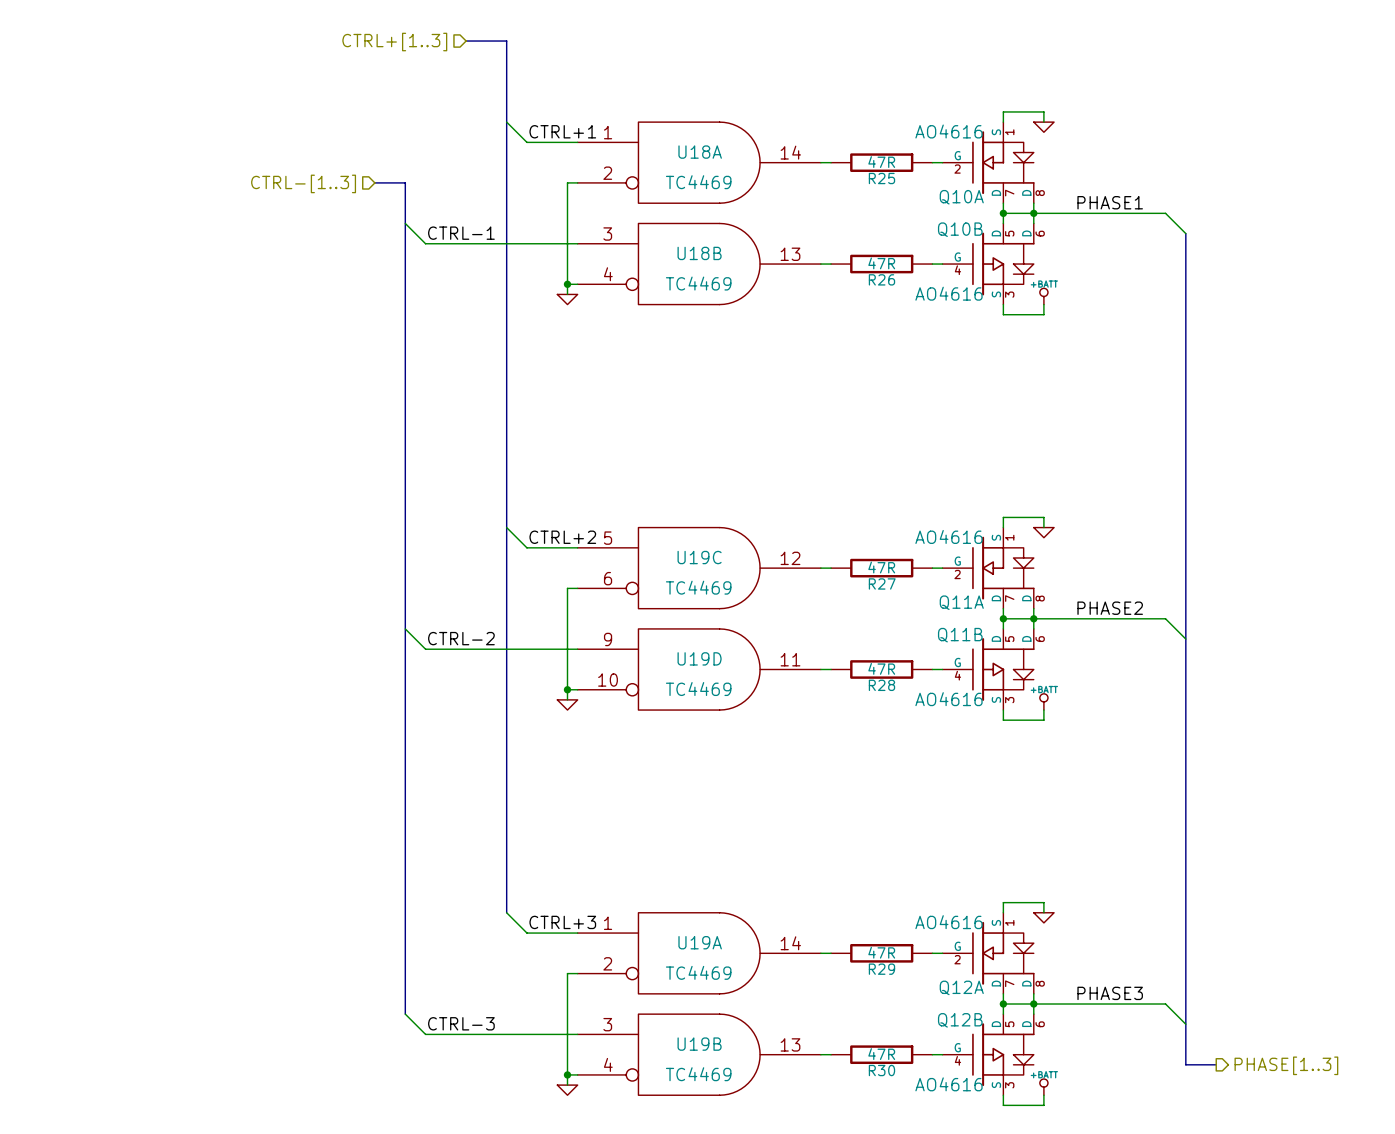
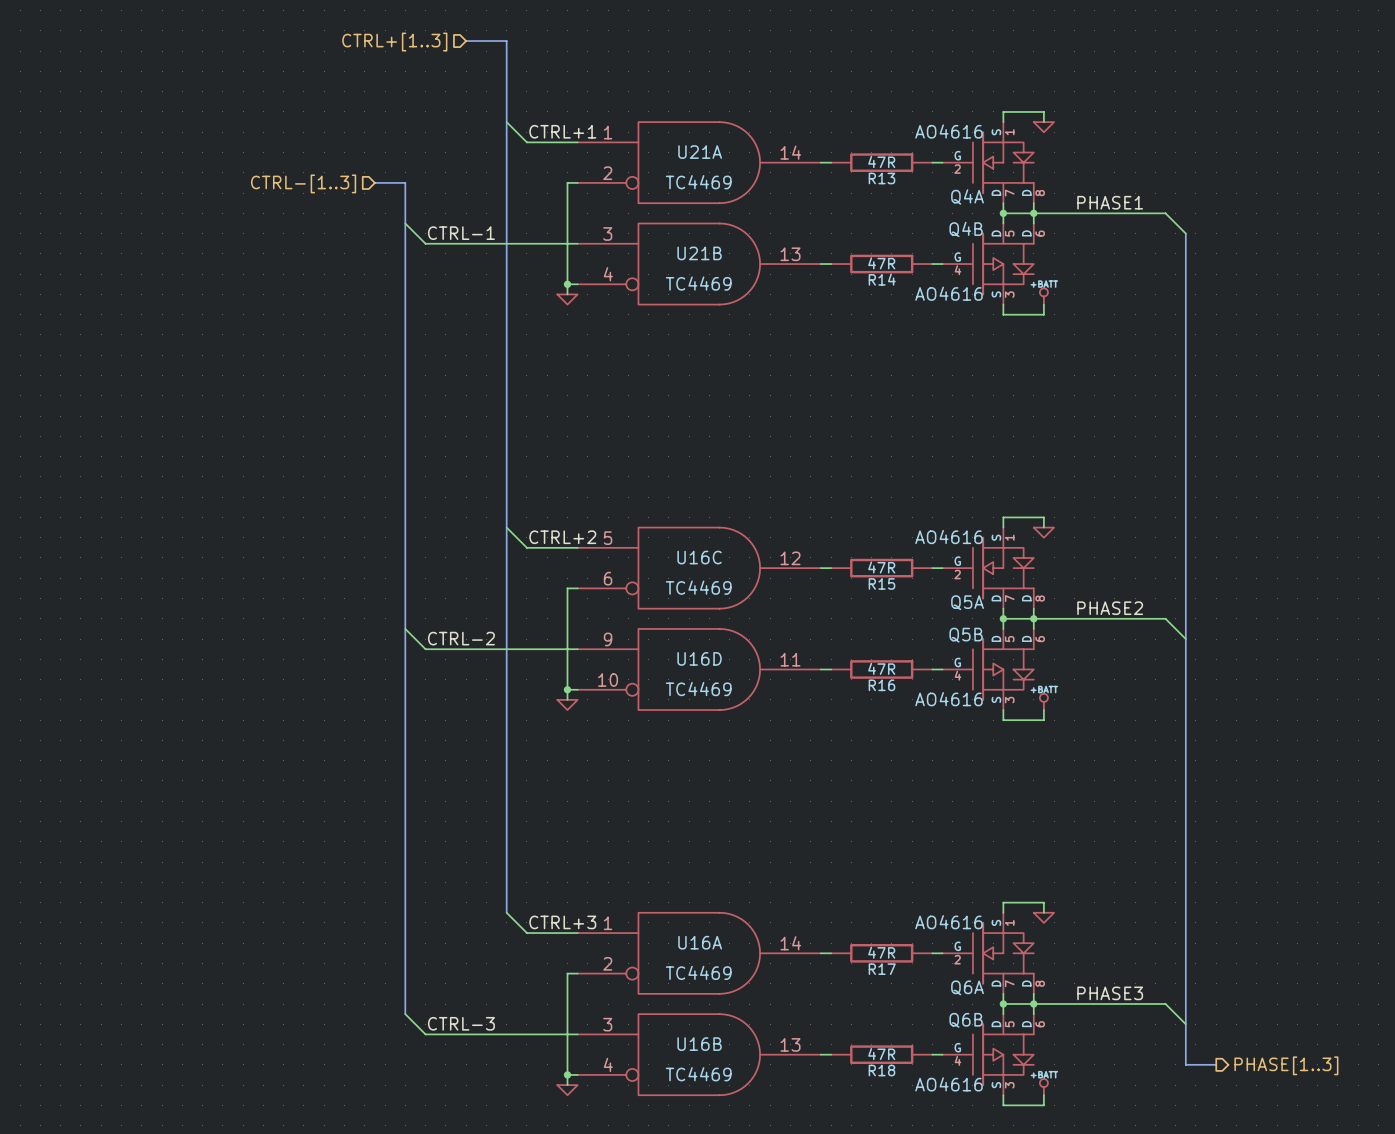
U18A name: U18A (700, 152) -> U21A (700, 152)
R25 name: R25 (881, 178) -> R13 (881, 178)
Q10A name: Q10A (961, 197) -> Q4A (967, 196)
Q10B name: Q10B (960, 229) -> Q4B (966, 229)
U18B name: U18B (699, 253) -> U21B (699, 253)
R26 name: R26 (881, 279) -> R14 (882, 279)
U19C name: U19C (699, 557) -> U16C (699, 557)
R27 name: R27 (882, 583) -> R15 (881, 583)
Q11A name: Q11A (961, 602) -> Q5A (967, 602)
Q11B name: Q11B (960, 635) -> Q5B (966, 635)
U19D name: U19D (699, 658) -> U16D (699, 658)
R28 name: R28 (881, 685) -> R16 (881, 685)
U19A name: U19A (700, 942) -> U16A (700, 942)
R29 name: R29 (881, 969) -> R17 (882, 969)
Q12A name: Q12A (961, 987) -> Q6A (967, 987)
Q12B name: Q12B (960, 1020) -> Q6B (966, 1020)
U19B name: U19B (699, 1044) -> U16B (699, 1044)
R30 name: R30 (881, 1070) -> R18 (881, 1070)

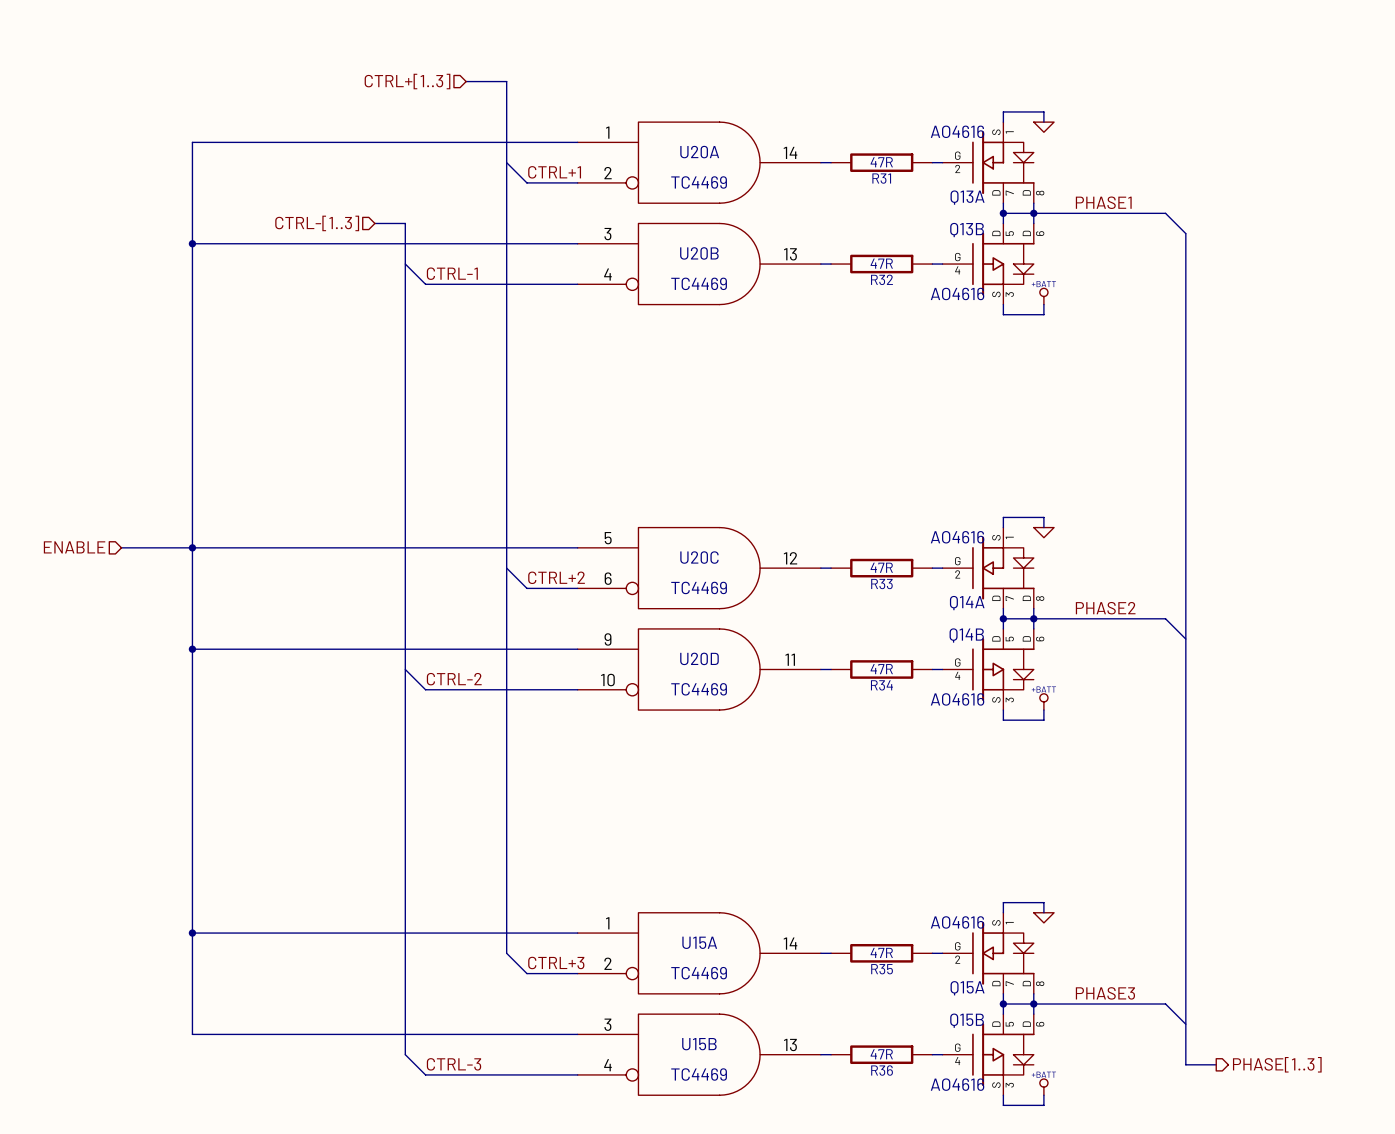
bus: (466, 41) (506, 41) (506, 81) -> (466, 81) (506, 81)
hierarchical label position: CTRL+[1..3] (394, 42) -> CTRL+[1..3] (407, 81)
wire: (506, 122) (526, 142) -> none
label position: CTRL+1 (562, 131) -> CTRL+1 (554, 172)
U21A name: U21A (700, 152) -> U20A (699, 152)
R13 name: R13 (881, 178) -> R31 (881, 178)
bus: (374, 182) (405, 182) (405, 223) -> (374, 223) (405, 223)
wire: (567, 182) (567, 294) -> (567, 182) (526, 182) (506, 162)
hierarchical label position: CTRL-[1..3] (303, 183) -> CTRL-[1..3] (317, 223)
Q4A name: Q4A (967, 196) -> Q13A (967, 197)
wire: (405, 223) (425, 243) -> (192, 243) (425, 243)
Q4B name: Q4B (966, 229) -> Q13B (967, 230)
label position: CTRL-1 (461, 233) -> CTRL-1 (452, 273)
junction: none -> (192, 243)
U21B name: U21B (699, 253) -> U20B (699, 253)
wire: none -> (405, 264) (425, 284) (567, 284)
R14 name: R14 (882, 279) -> R32 (881, 279)
junction: (567, 284) -> none
power symbol: (567, 299) -> none
wire: (506, 527) (526, 547) -> (121, 547) (526, 547)
label position: CTRL+2 (562, 537) -> CTRL+2 (556, 577)
hierarchical label: none -> ENABLE (74, 547)
junction: none -> (192, 547)
U16C name: U16C (699, 557) -> U20C (699, 557)
R15 name: R15 (881, 583) -> R33 (881, 584)
wire: (567, 588) (567, 699) -> (567, 588) (526, 588) (506, 568)
Q5A name: Q5A (967, 602) -> Q14A (967, 603)
wire: (405, 628) (425, 649) -> (192, 649) (425, 649)
Q5B name: Q5B (966, 635) -> Q14B (966, 635)
label position: CTRL-2 (461, 638) -> CTRL-2 (454, 679)
junction: none -> (192, 649)
U16D name: U16D (699, 658) -> U20D (699, 658)
wire: none -> (405, 669) (425, 689) (567, 689)
R16 name: R16 (881, 685) -> R34 (881, 685)
junction: (567, 689) -> none
power symbol: (567, 704) -> none
wire: (506, 912) (526, 933) -> (192, 933) (526, 933)
bus: none -> (506, 912) (506, 953)
label position: CTRL+3 (562, 922) -> CTRL+3 (556, 962)
junction: none -> (192, 933)
U16A name: U16A (700, 942) -> U15A (699, 942)
R17 name: R17 (882, 969) -> R35 (882, 969)
wire: (567, 973) (567, 1085) -> (567, 973) (526, 973) (506, 953)
Q6A name: Q6A (967, 987) -> Q15A (967, 988)
wire: (405, 1014) (425, 1034) -> (526, 142) (192, 142) (192, 1034) (425, 1034)
bus: none -> (405, 1014) (405, 1054)
Q6B name: Q6B (966, 1020) -> Q15B (967, 1020)
label position: CTRL-3 (461, 1023) -> CTRL-3 (454, 1064)
U16B name: U16B (699, 1044) -> U15B (699, 1044)
wire: none -> (405, 1054) (425, 1074) (567, 1074)
R18 name: R18 (881, 1070) -> R36 (882, 1070)
junction: (567, 1074) -> none
power symbol: (567, 1090) -> none

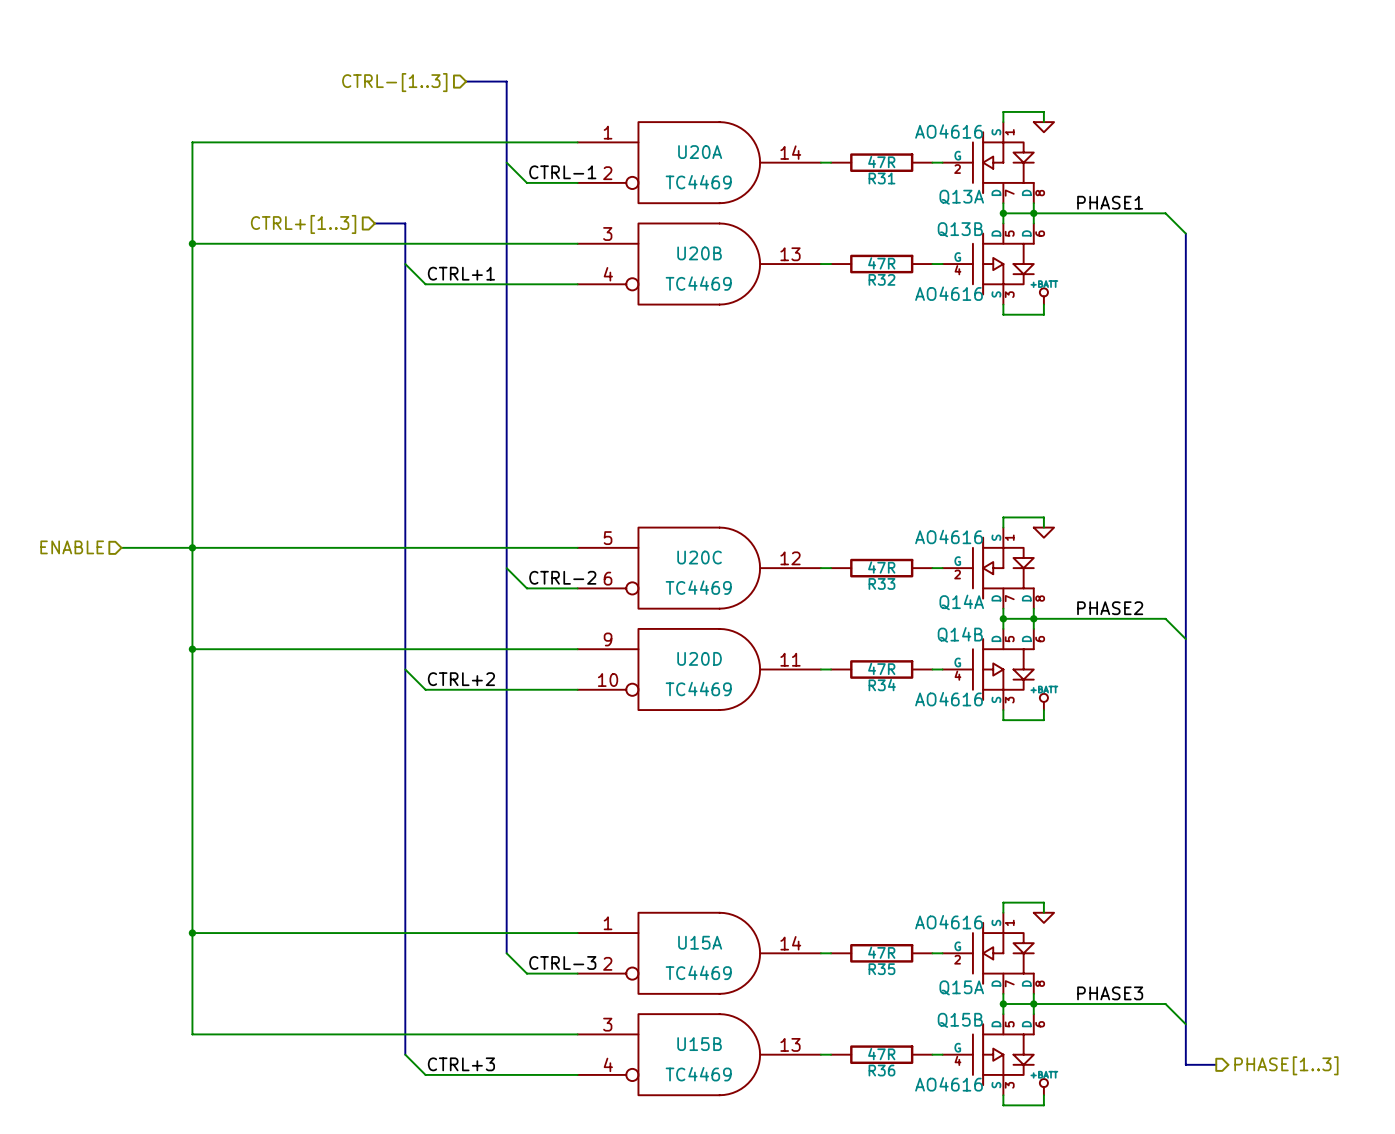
hierarchical label: CTRL+[1..3] (407, 81) -> CTRL-[1..3] (394, 82)
label: CTRL+1 (554, 172) -> CTRL-1 (562, 172)
hierarchical label: CTRL-[1..3] (317, 223) -> CTRL+[1..3] (303, 224)
label: CTRL-1 (452, 273) -> CTRL+1 (461, 273)
label: CTRL+2 (556, 577) -> CTRL-2 (562, 577)
label: CTRL-2 (454, 679) -> CTRL+2 (461, 679)
label: CTRL+3 (556, 962) -> CTRL-3 (562, 962)
label: CTRL-3 (454, 1064) -> CTRL+3 (461, 1064)

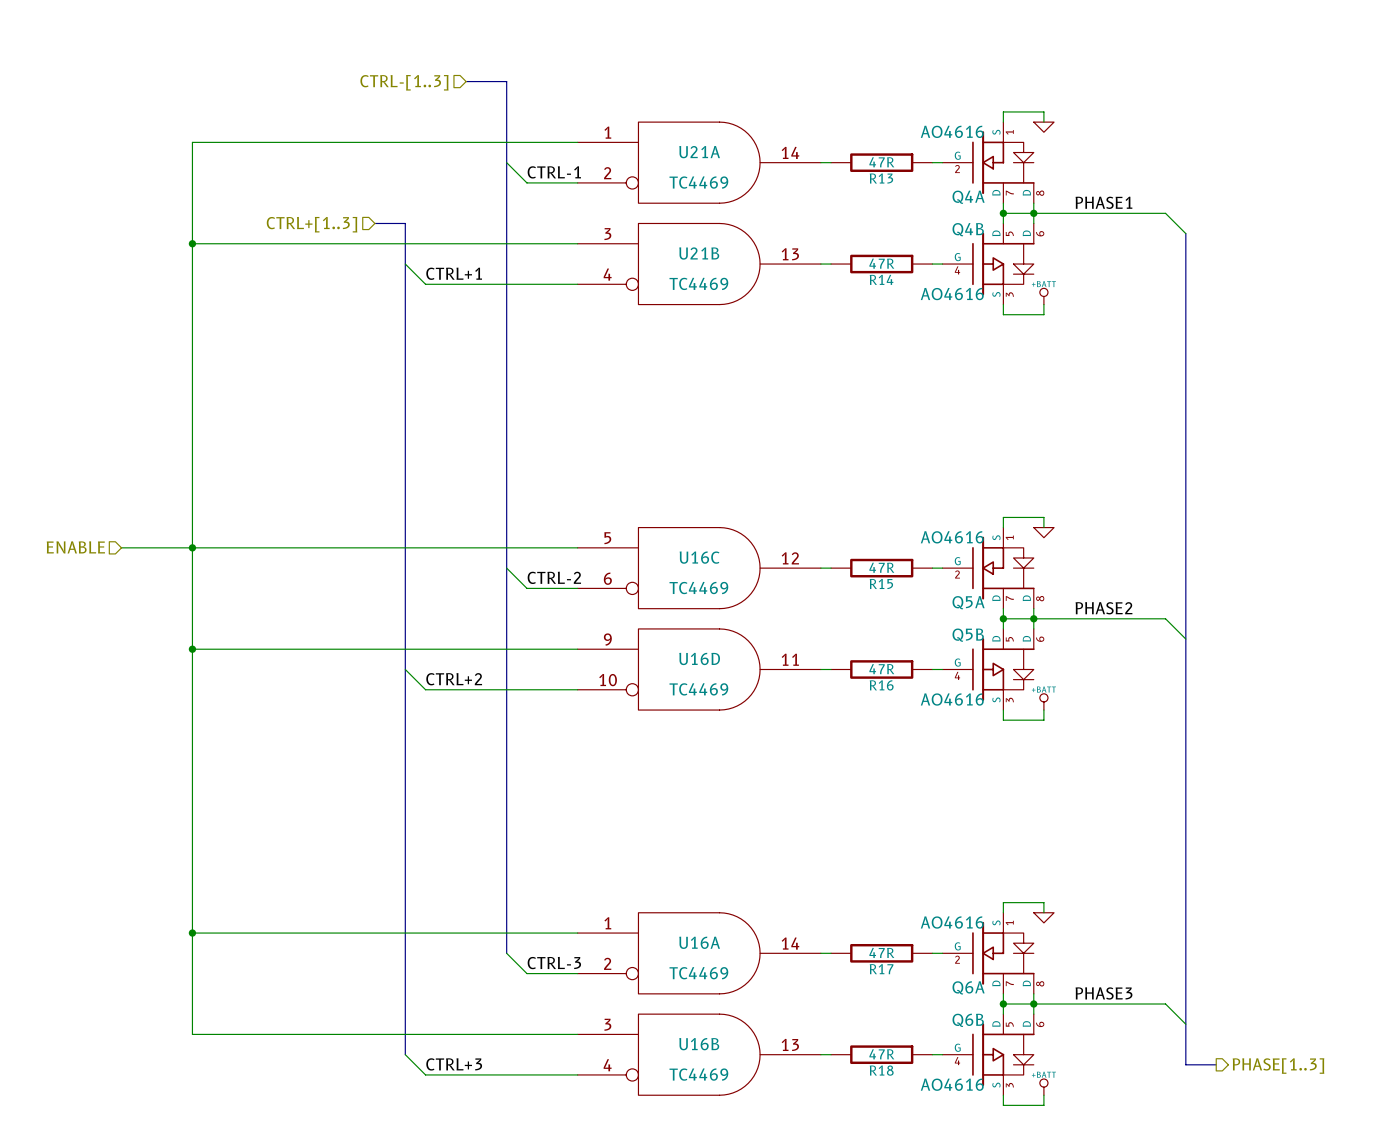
U20A name: U20A (700, 152) -> U21A (699, 152)
R31 name: R31 (881, 178) -> R13 (881, 178)
Q13A name: Q13A (961, 197) -> Q4A (968, 197)
Q13B name: Q13B (960, 229) -> Q4B (968, 229)
U20B name: U20B (699, 253) -> U21B (699, 253)
R32 name: R32 (881, 279) -> R14 (881, 279)
U20C name: U20C (699, 557) -> U16C (699, 557)
R33 name: R33 (881, 583) -> R15 (881, 583)
Q14A name: Q14A (961, 602) -> Q5A (968, 602)
Q14B name: Q14B (960, 634) -> Q5B (968, 635)
U20D name: U20D (699, 658) -> U16D (699, 658)
R34 name: R34 (882, 685) -> R16 (881, 685)
U15A name: U15A (700, 942) -> U16A (699, 942)
R35 name: R35 (881, 969) -> R17 (881, 969)
Q15A name: Q15A (961, 987) -> Q6A (968, 987)
Q15B name: Q15B (960, 1020) -> Q6B (968, 1020)
U15B name: U15B (699, 1044) -> U16B (699, 1044)
R36 name: R36 (881, 1070) -> R18 (881, 1070)

